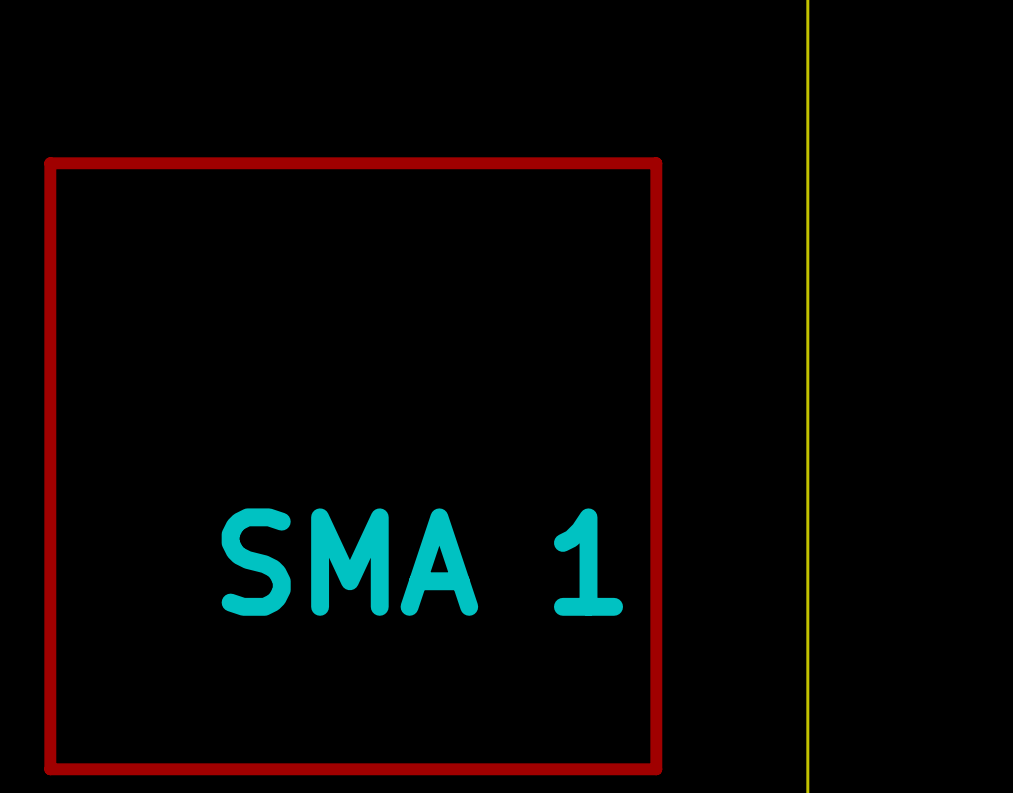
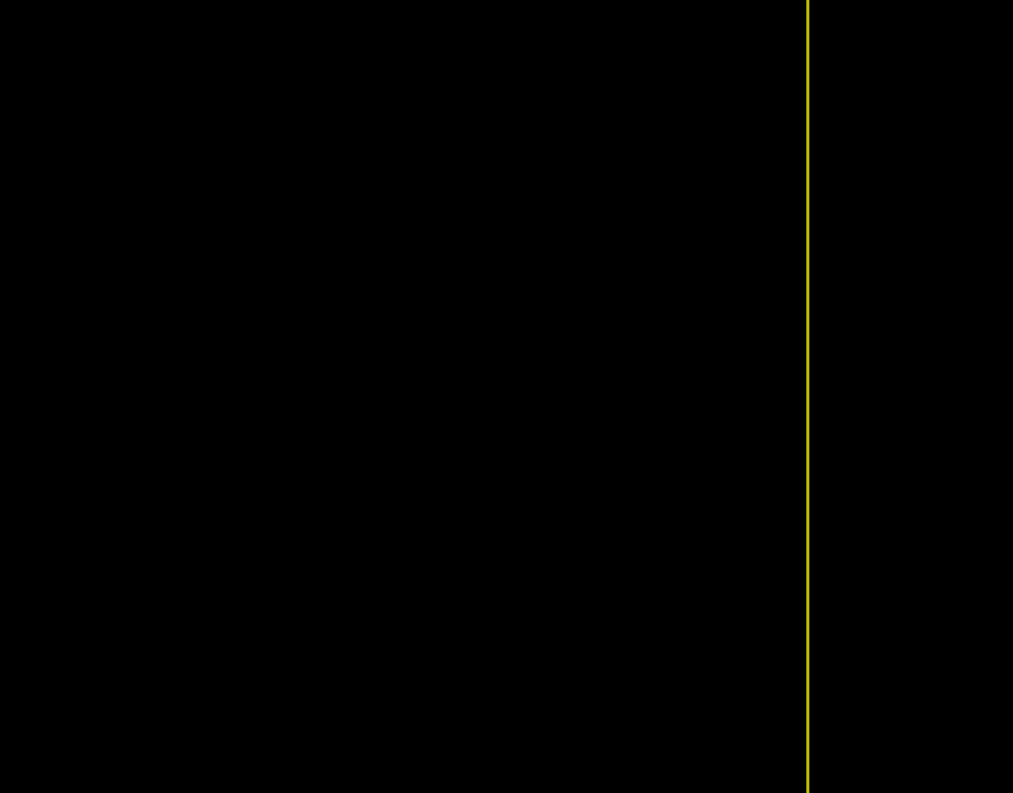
top track: (50, 163) (656, 163) (656, 769) (50, 769) (50, 163) -> none
text: SMA 1 (422, 562) -> none

